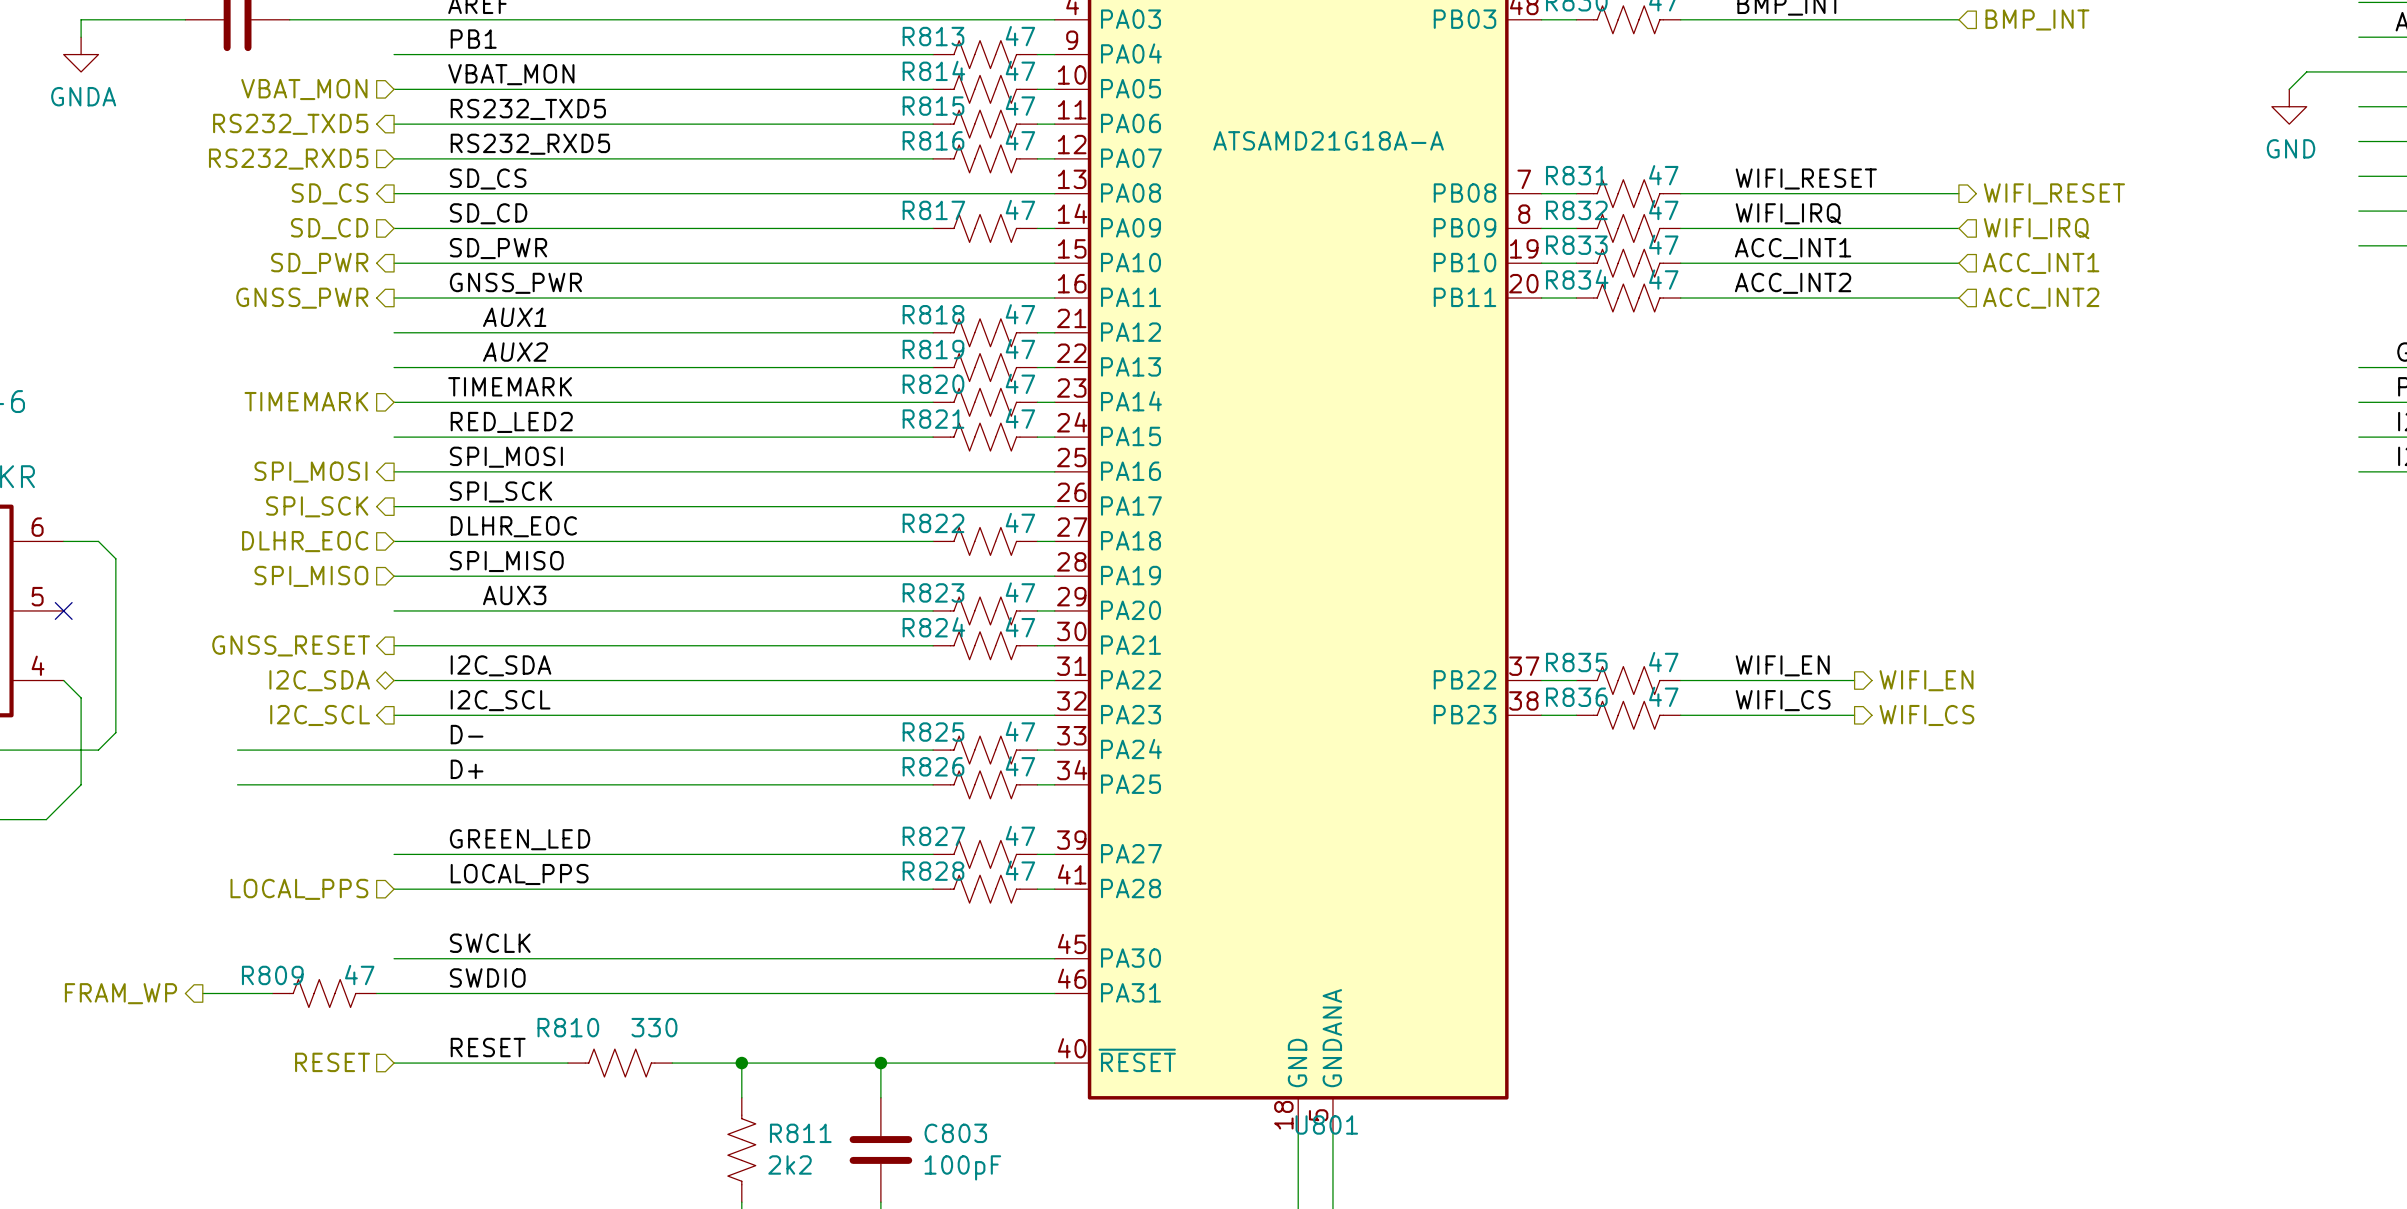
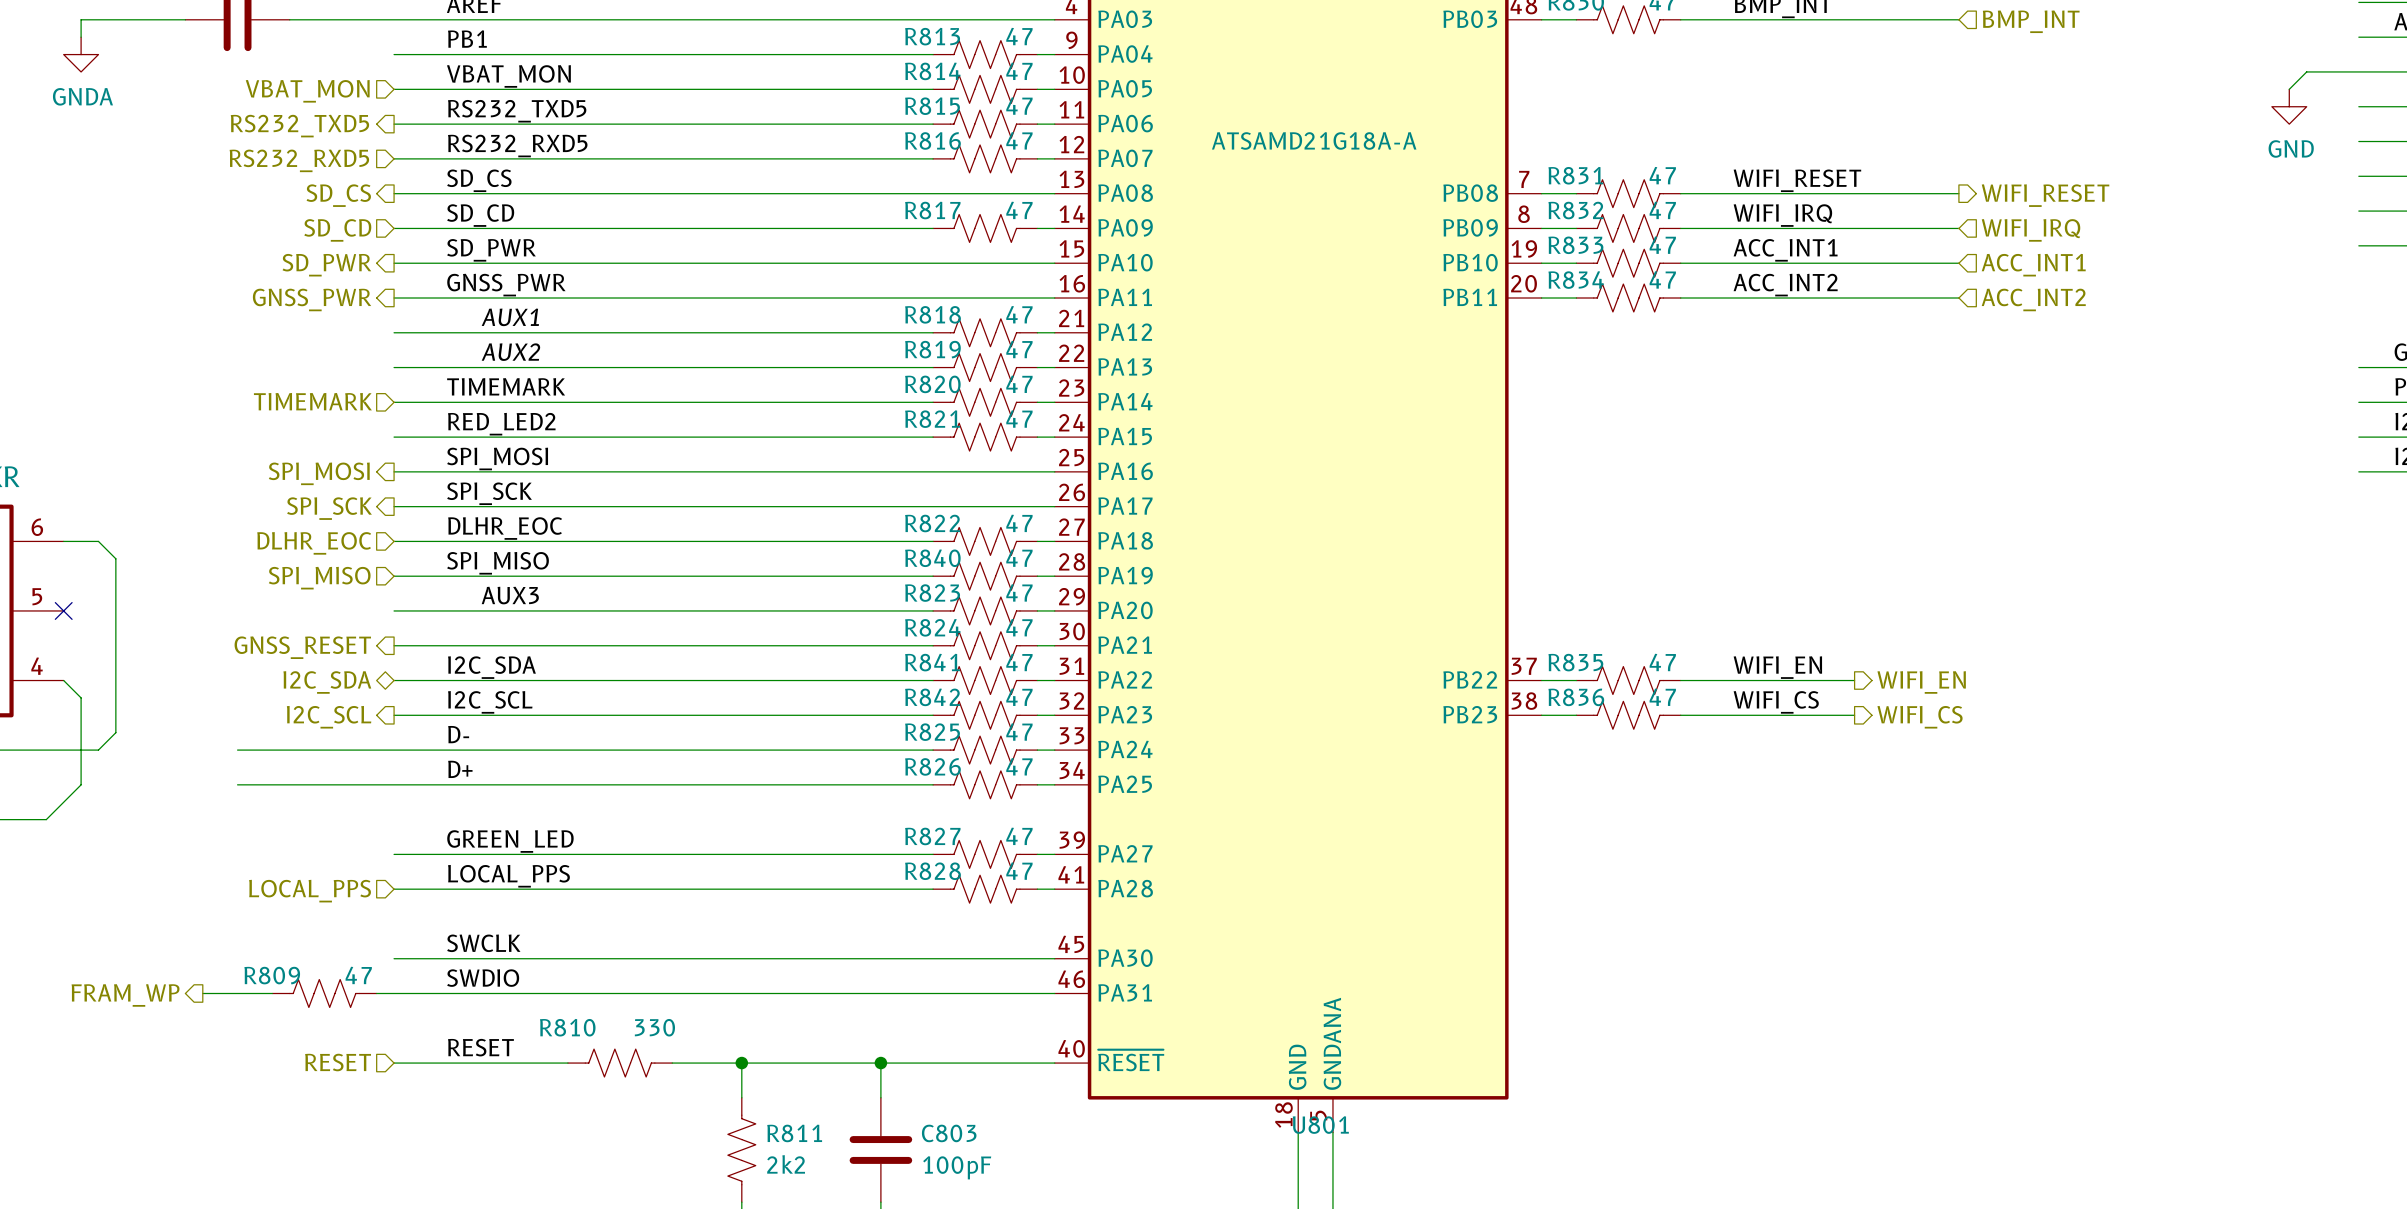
wire: (933, 576) (1037, 576) -> none
R840: none -> 47 (985, 576)
wire: (933, 680) (1037, 680) -> none
R841: none -> 47 (985, 680)
wire: (933, 715) (1037, 715) -> none
R842: none -> 47 (985, 715)

